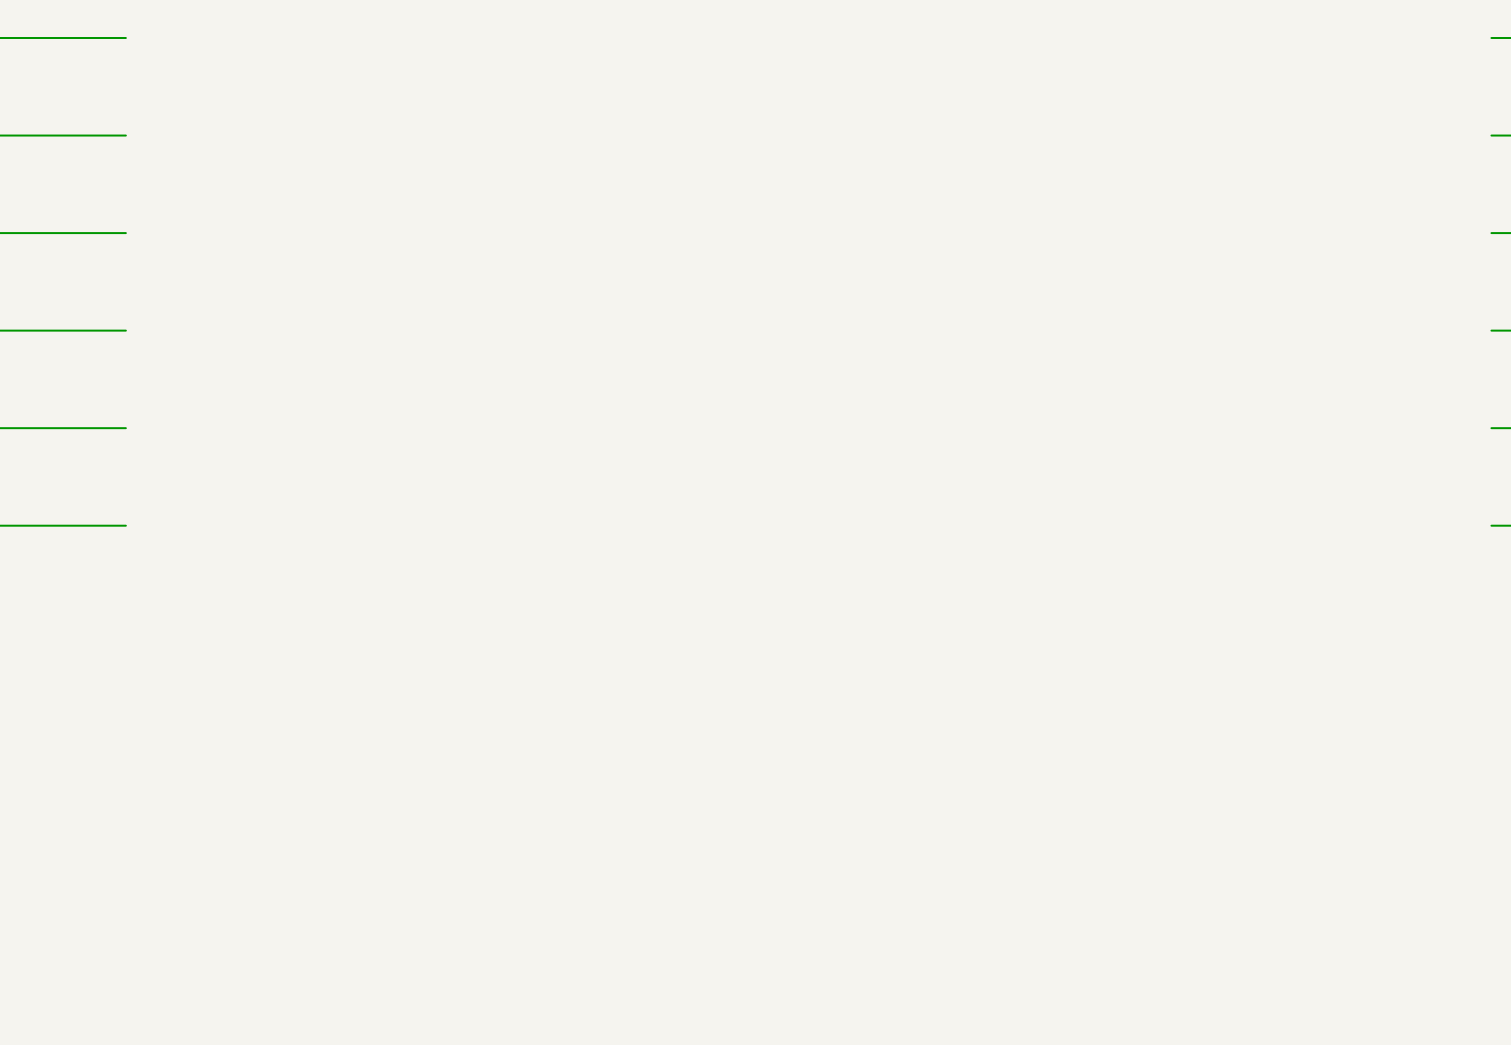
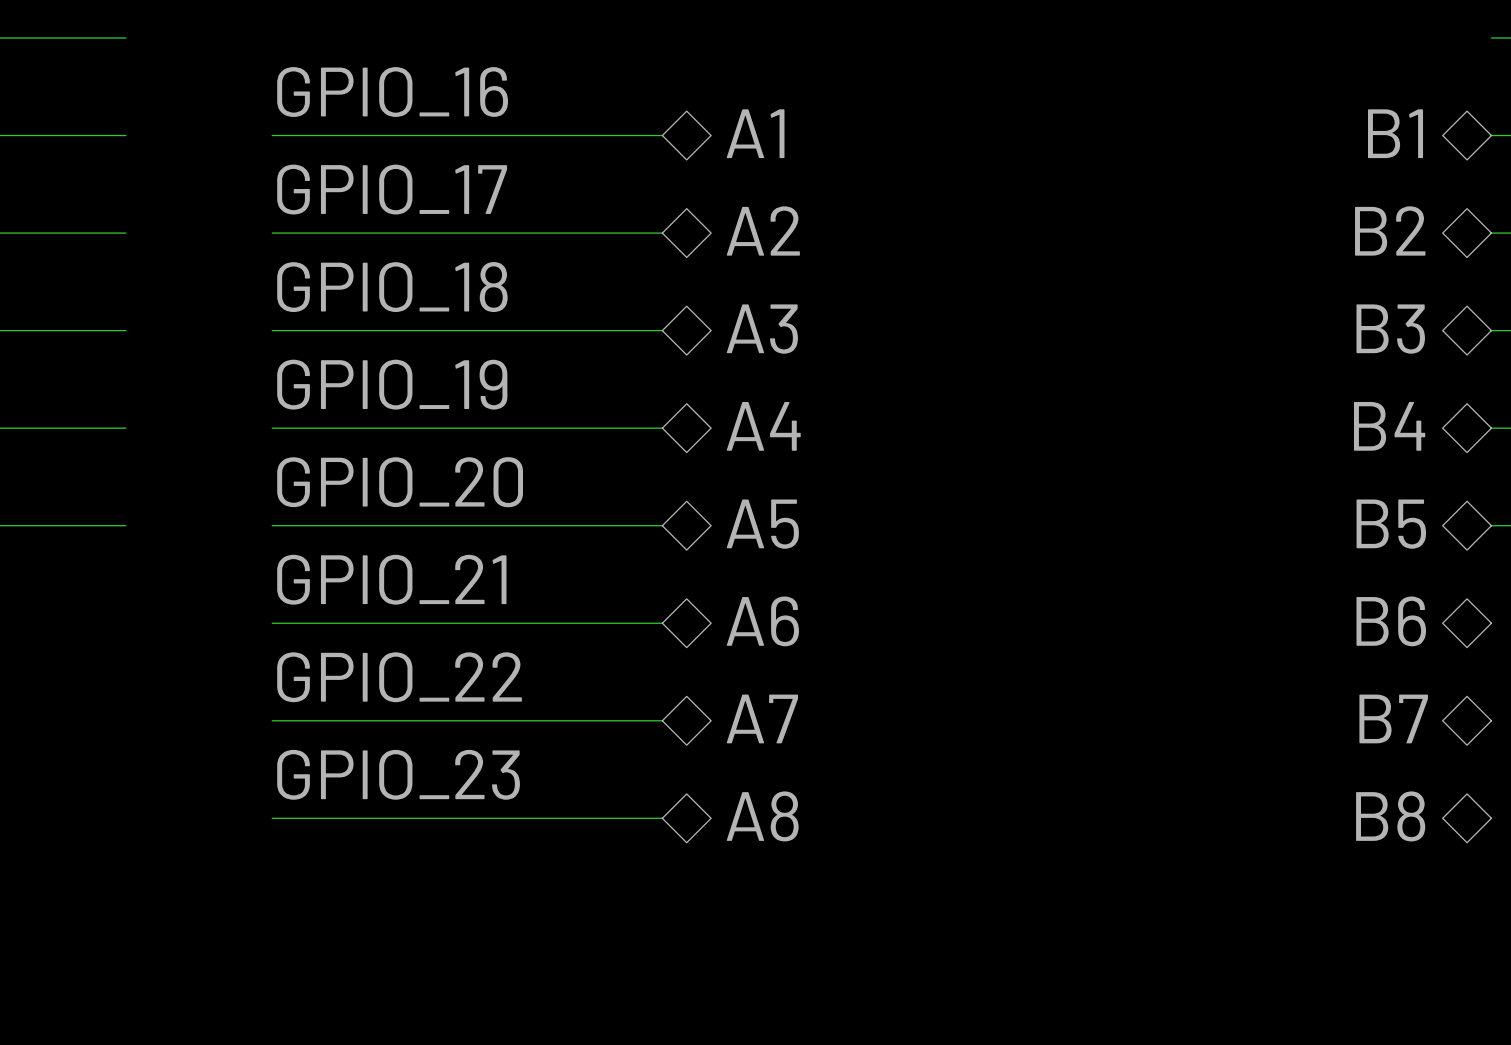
label: none -> GPIO_16 (392, 92)
sheet pin: none -> A1 (755, 133)
sheet pin: none -> B1 (1395, 133)
wire: none -> (272, 135) (662, 135)
label: none -> GPIO_17 (392, 189)
sheet pin: none -> A2 (763, 230)
sheet pin: none -> B2 (1390, 230)
wire: none -> (272, 233) (662, 233)
label: none -> GPIO_18 (392, 287)
sheet pin: none -> A3 (762, 329)
sheet pin: none -> B3 (1390, 329)
wire: none -> (272, 330) (662, 330)
label: none -> GPIO_19 (392, 384)
sheet pin: none -> A4 (763, 426)
sheet pin: none -> B4 (1389, 426)
wire: none -> (272, 428) (662, 428)
label: none -> GPIO_20 (400, 482)
sheet pin: none -> A5 (762, 524)
sheet pin: none -> B5 (1391, 524)
wire: none -> (272, 525) (662, 525)
label: none -> GPIO_21 (391, 579)
sheet pin: none -> A6 (762, 621)
sheet pin: none -> B6 (1391, 621)
wire: none -> (272, 623) (662, 623)
label: none -> GPIO_22 (399, 677)
sheet pin: none -> A7 (762, 718)
sheet pin: none -> B7 (1393, 718)
wire: none -> (272, 720) (662, 720)
label: none -> GPIO_23 (398, 774)
sheet pin: none -> A8 (762, 816)
sheet pin: none -> B8 (1390, 816)
wire: none -> (272, 818) (662, 818)

